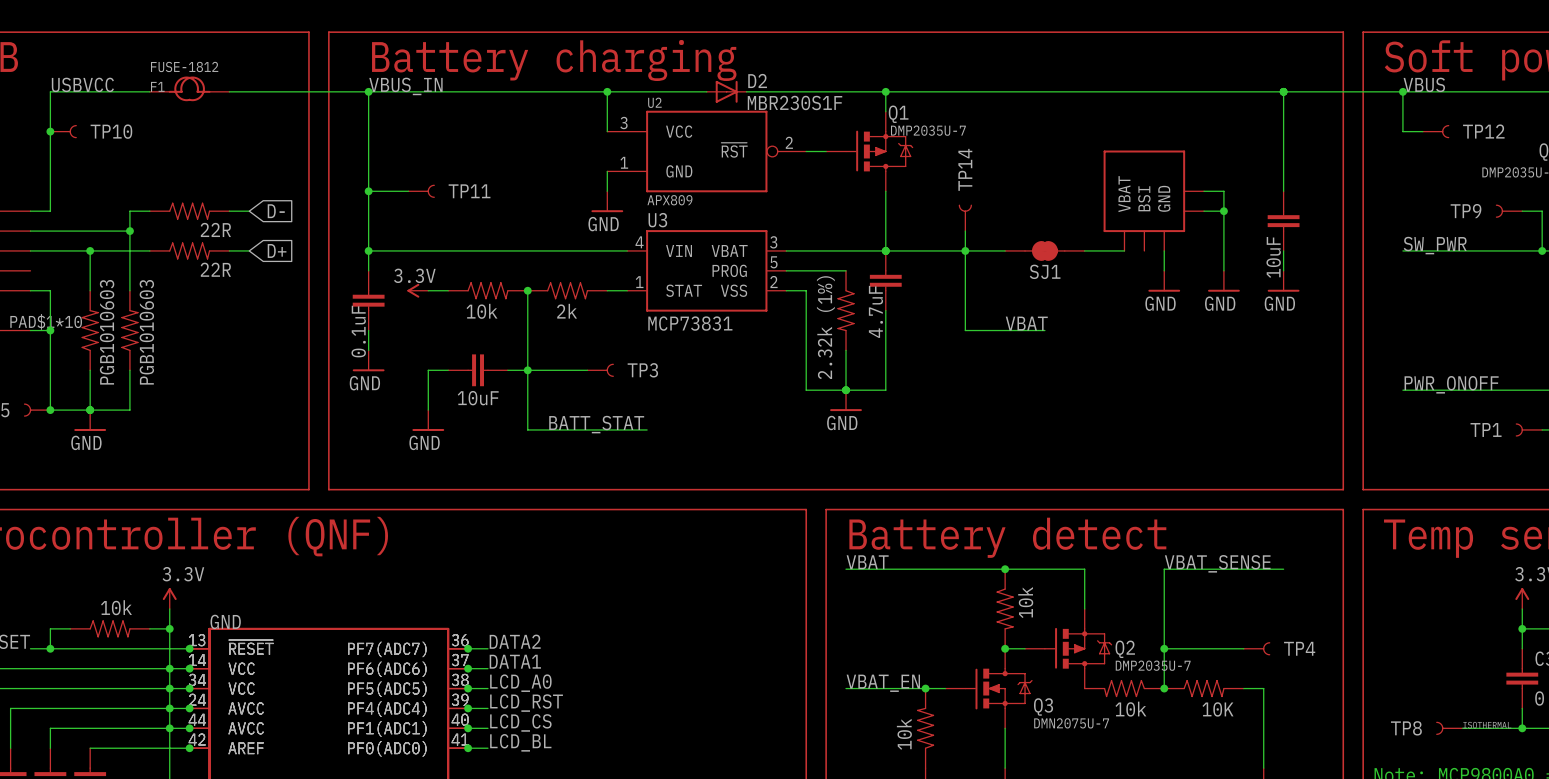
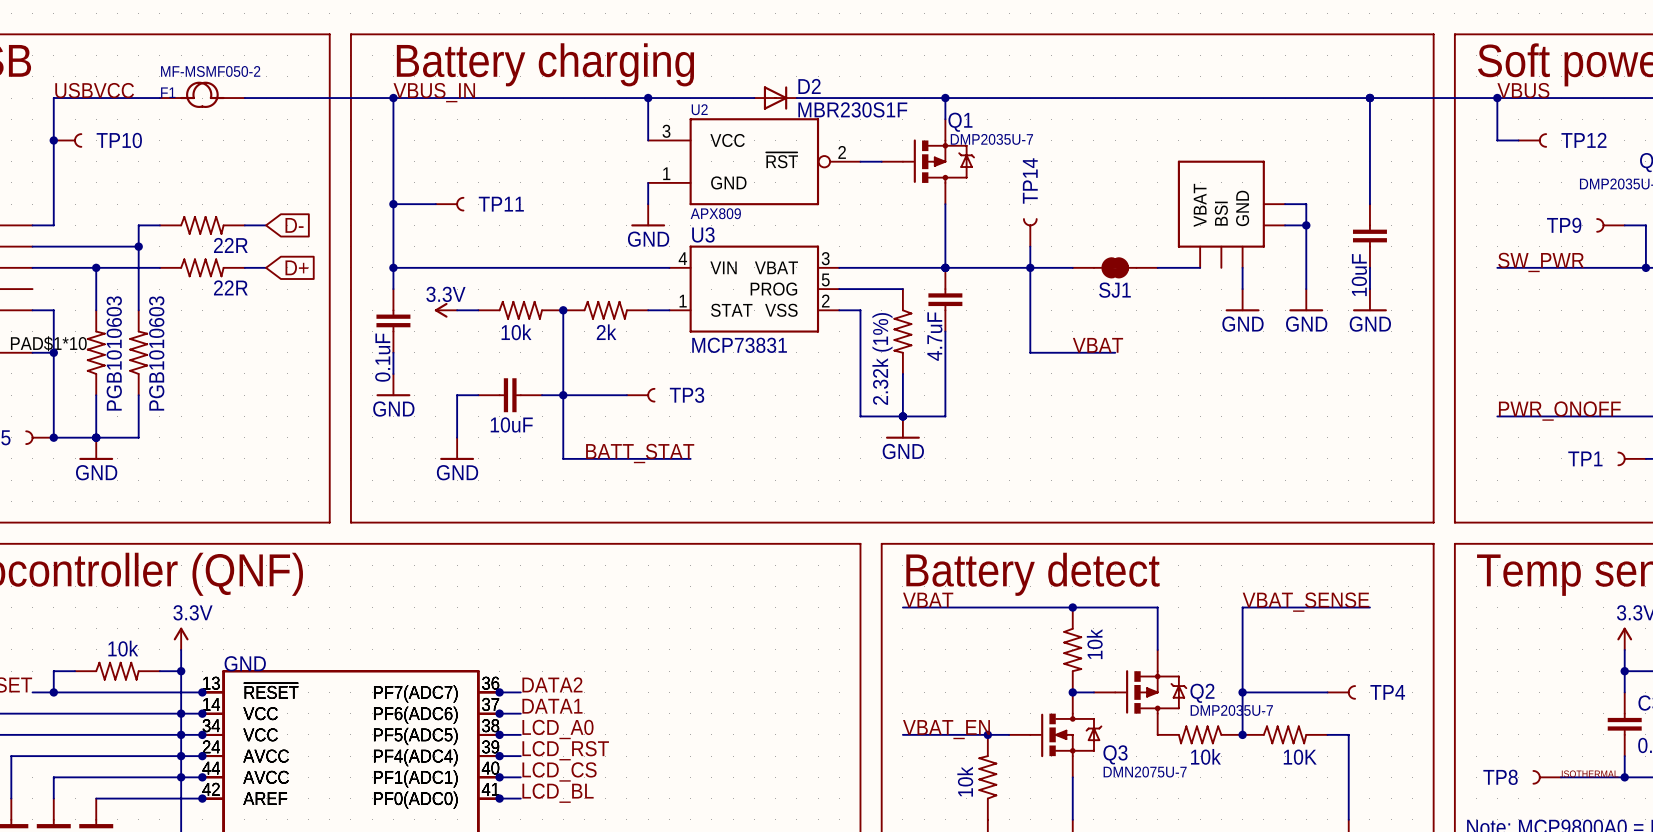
F1 value: FUSE-1812 (184, 66) -> none
F1 text: none -> MF-MSMF050-2 (210, 71)

